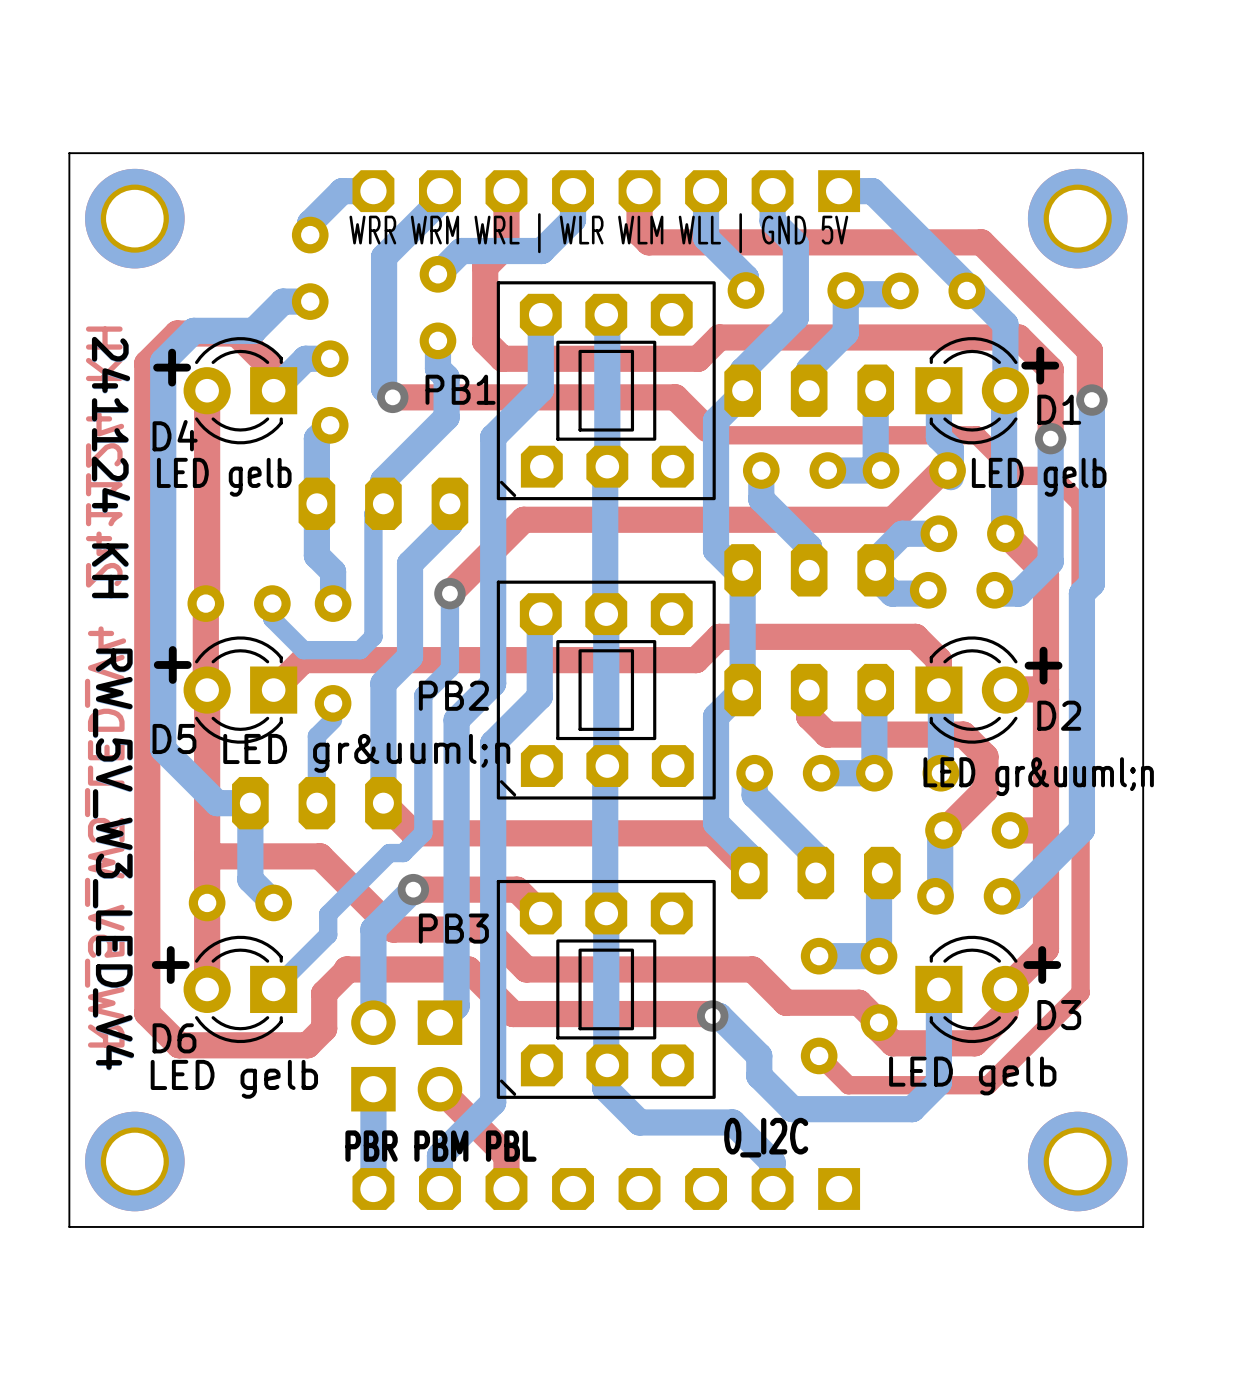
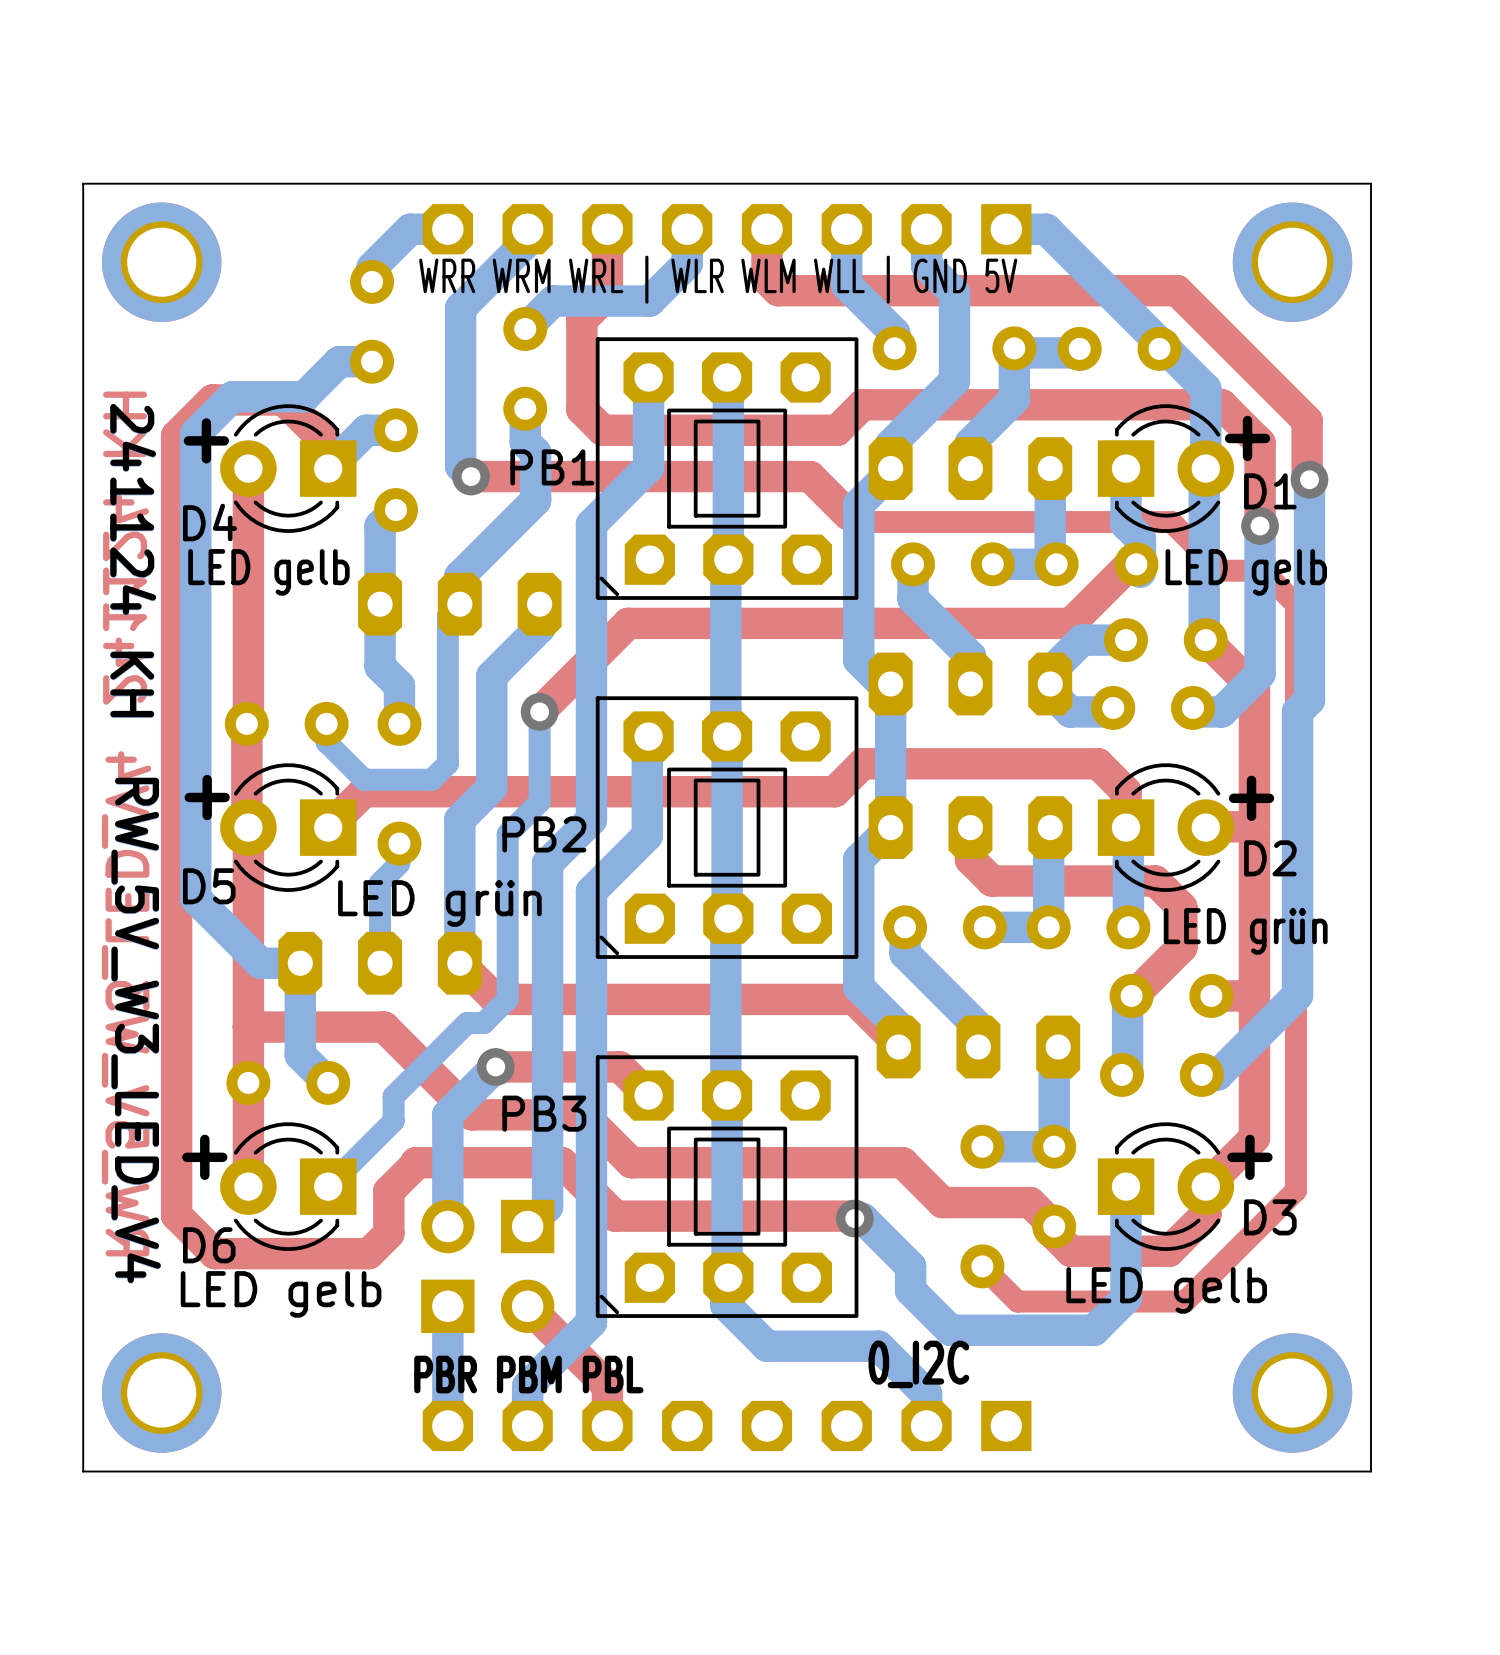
text: LED gr&uuml;n (366, 753) -> LED grün (439, 903)
text: LED gr&uuml;n (1038, 776) -> LED grün (1245, 931)

